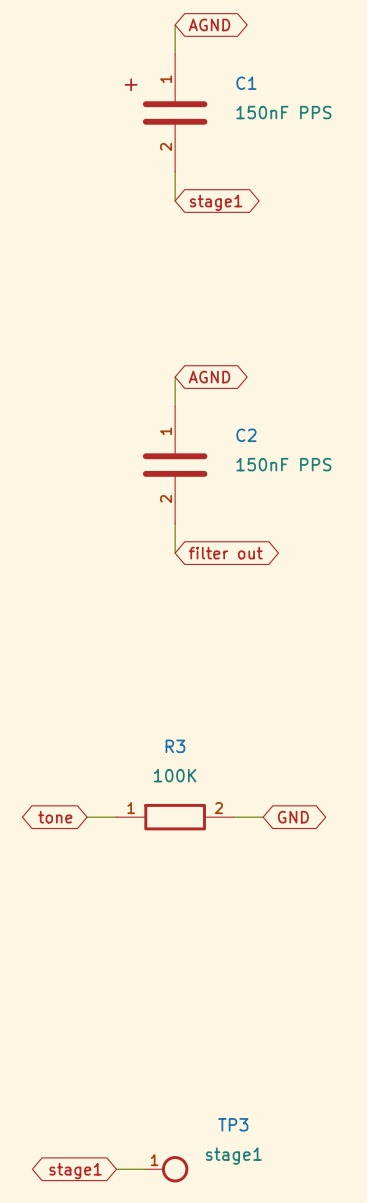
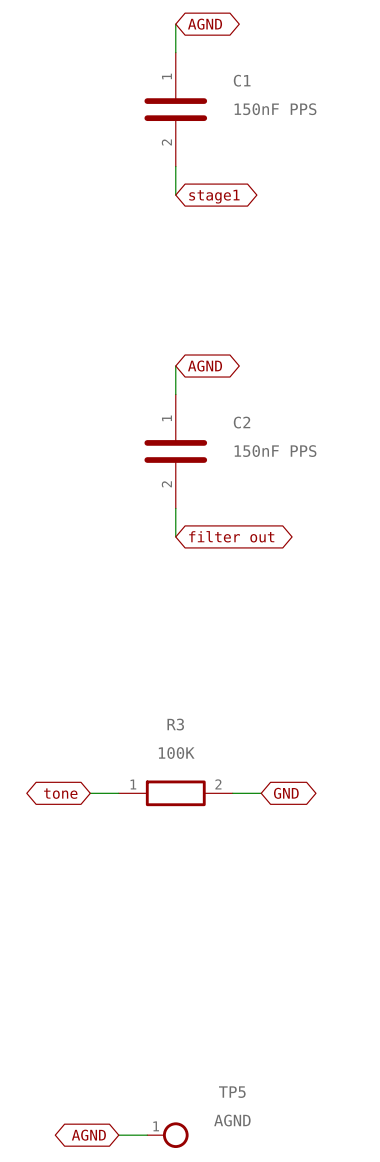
C1 text: + (131, 84) -> none
TP3 name: TP3 (233, 1124) -> TP5 (232, 1092)
TP3 value: stage1 (233, 1156) -> AGND (232, 1120)
global label: stage1 (75, 1171) -> AGND (88, 1135)

